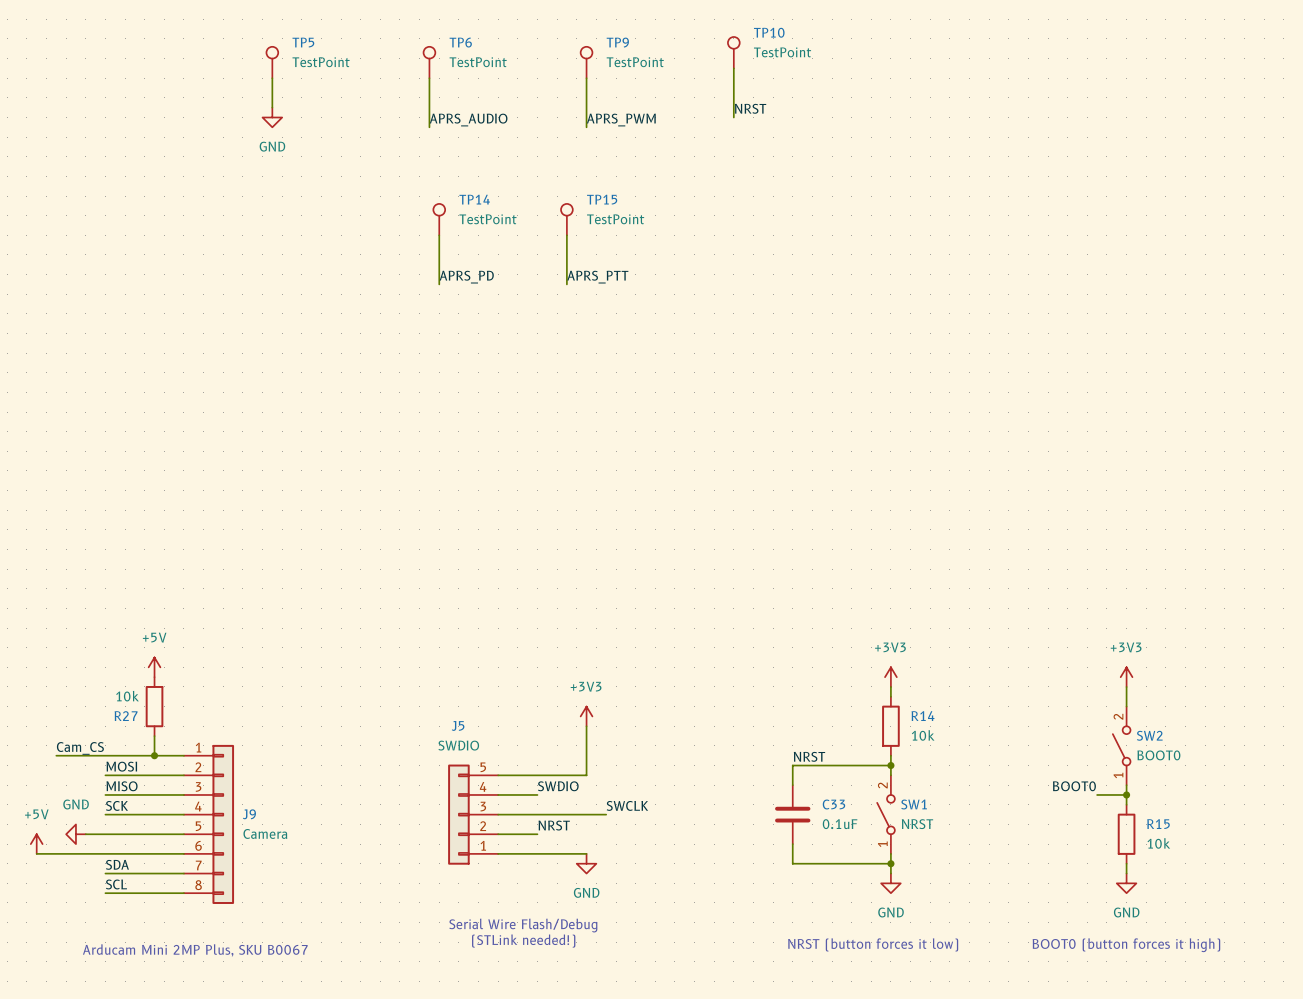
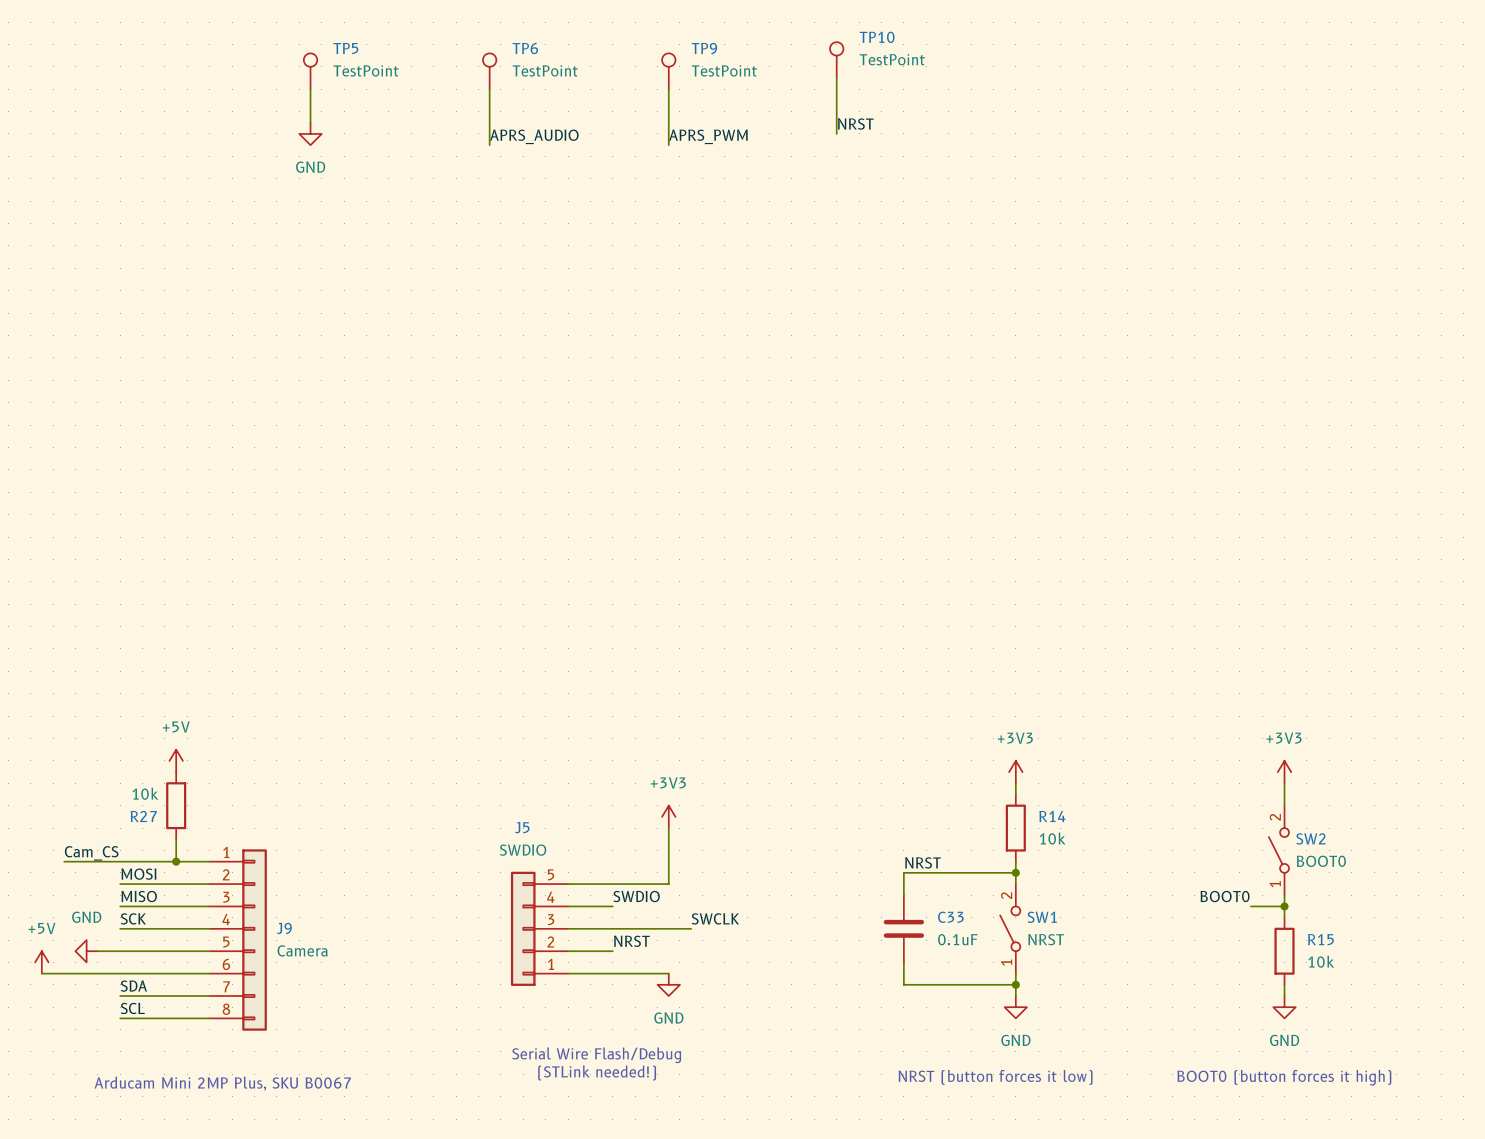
TP14: TestPoint (439, 219) -> none
TP15: TestPoint (566, 219) -> none
wire: (439, 235) (439, 284) -> none
wire: (566, 235) (566, 284) -> none
label: APRS_PD (466, 277) -> none
label: APRS_PTT (597, 277) -> none

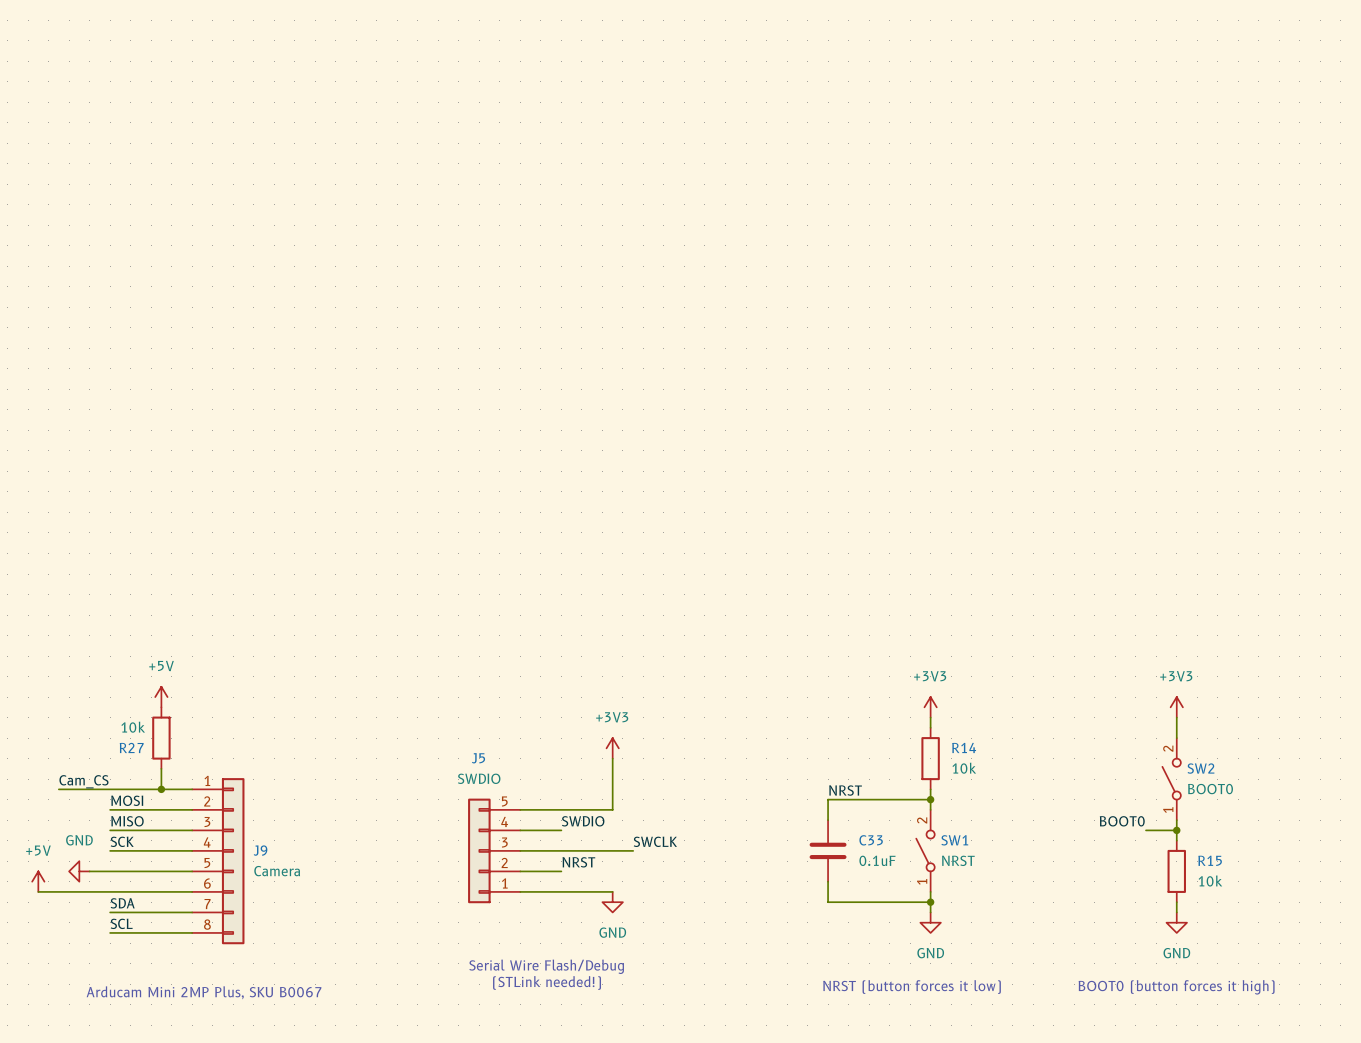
TP10: TestPoint (836, 60) -> none
TP5: TestPoint (310, 71) -> none
TP6: TestPoint (489, 71) -> none
TP9: TestPoint (668, 71) -> none
wire: (836, 77) (836, 133) -> none
wire: (310, 89) (310, 122) -> none
wire: (489, 89) (489, 145) -> none
wire: (668, 89) (668, 145) -> none
label: NRST (855, 124) -> none
power symbol: GND (310, 133) -> none
label: APRS_AUDIO (534, 136) -> none
label: APRS_PWM (708, 136) -> none

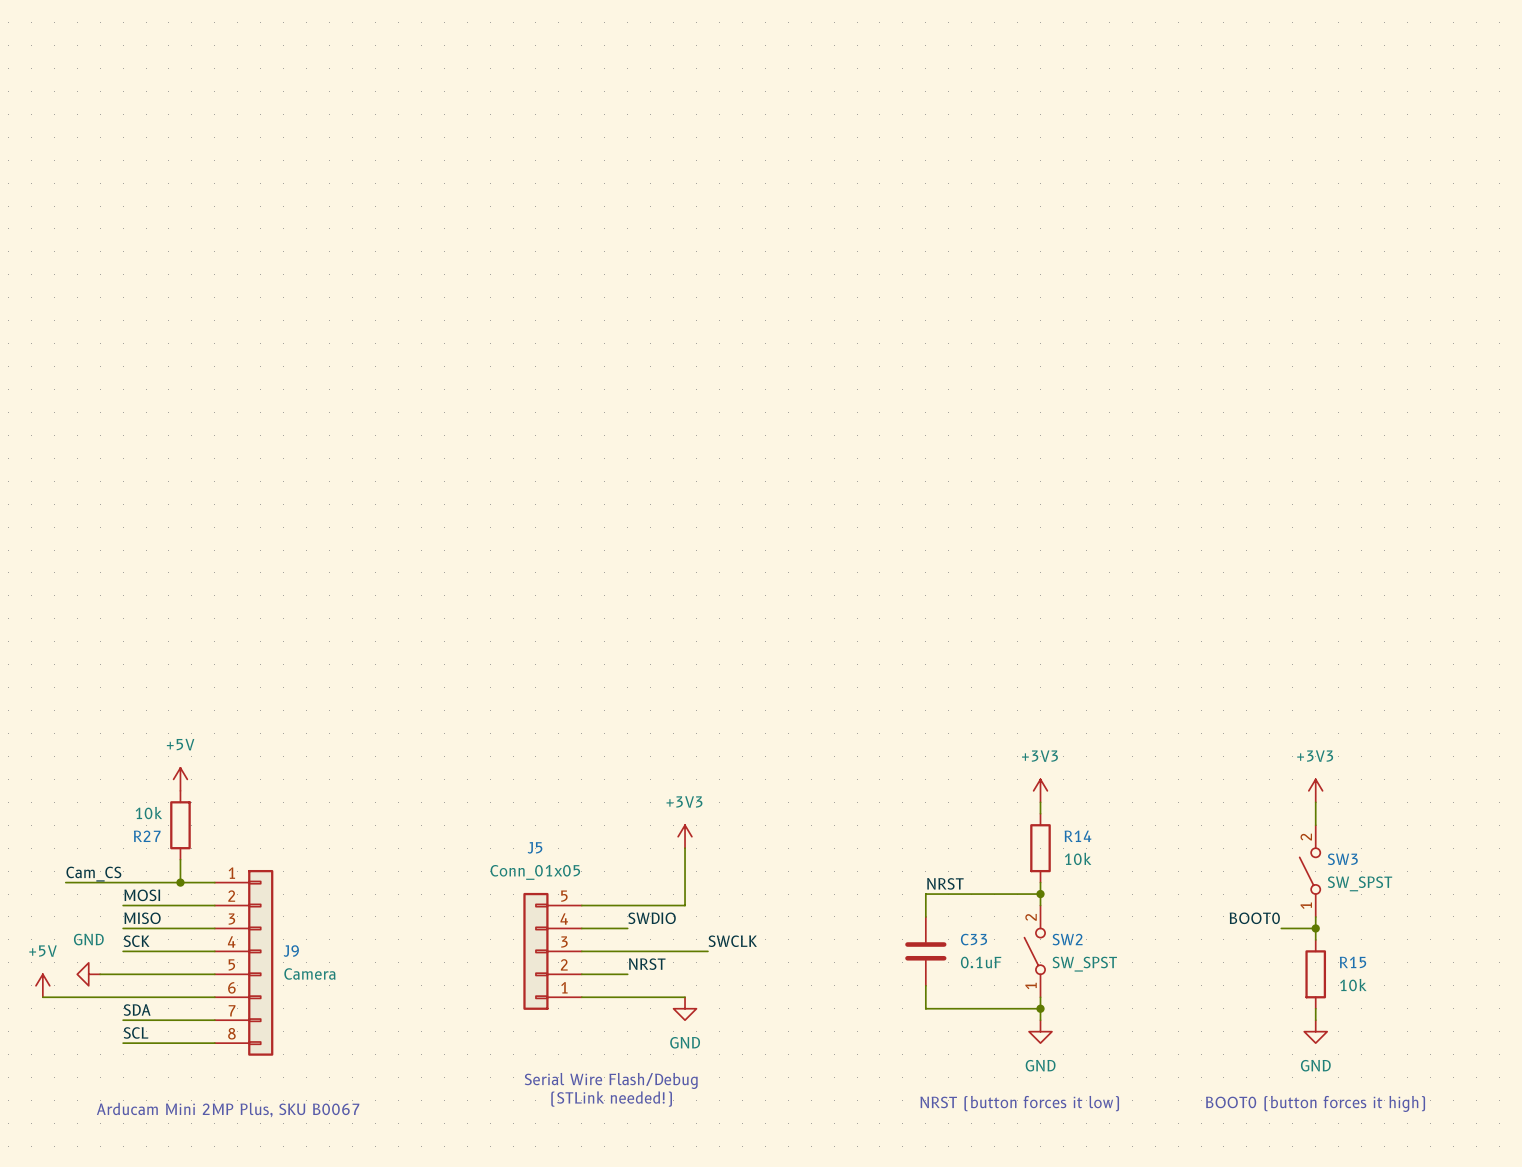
SW2 name: SW2 (1200, 768) -> SW3 (1342, 859)
J5 value: SWDIO (479, 778) -> Conn_01x05 (535, 872)
SW2 value: BOOT0 (1210, 789) -> SW_SPST (1359, 883)
SW1 name: SW1 (954, 840) -> SW2 (1067, 939)
SW1 value: NRST (958, 860) -> SW_SPST (1084, 964)

